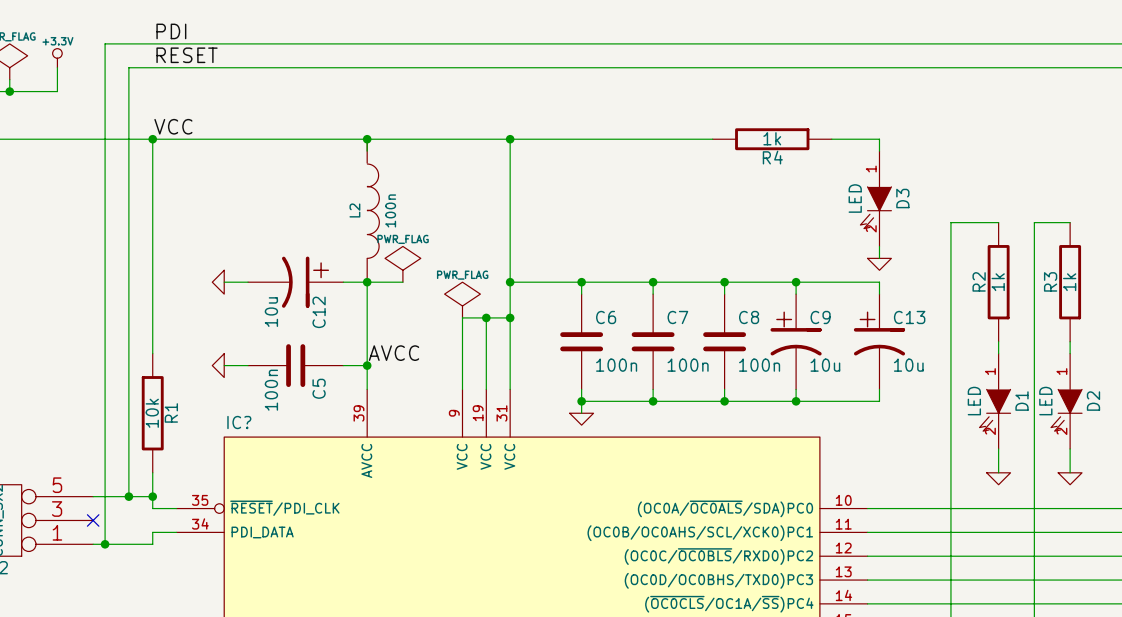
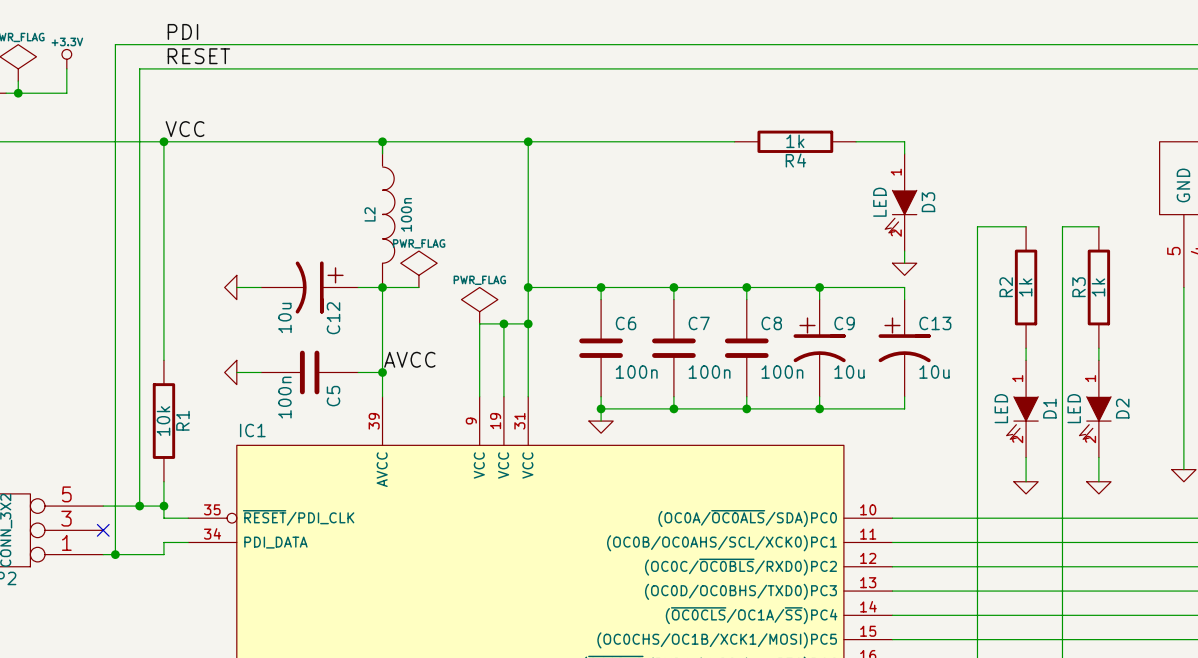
IC? name: IC? (239, 422) -> IC1 (252, 430)

